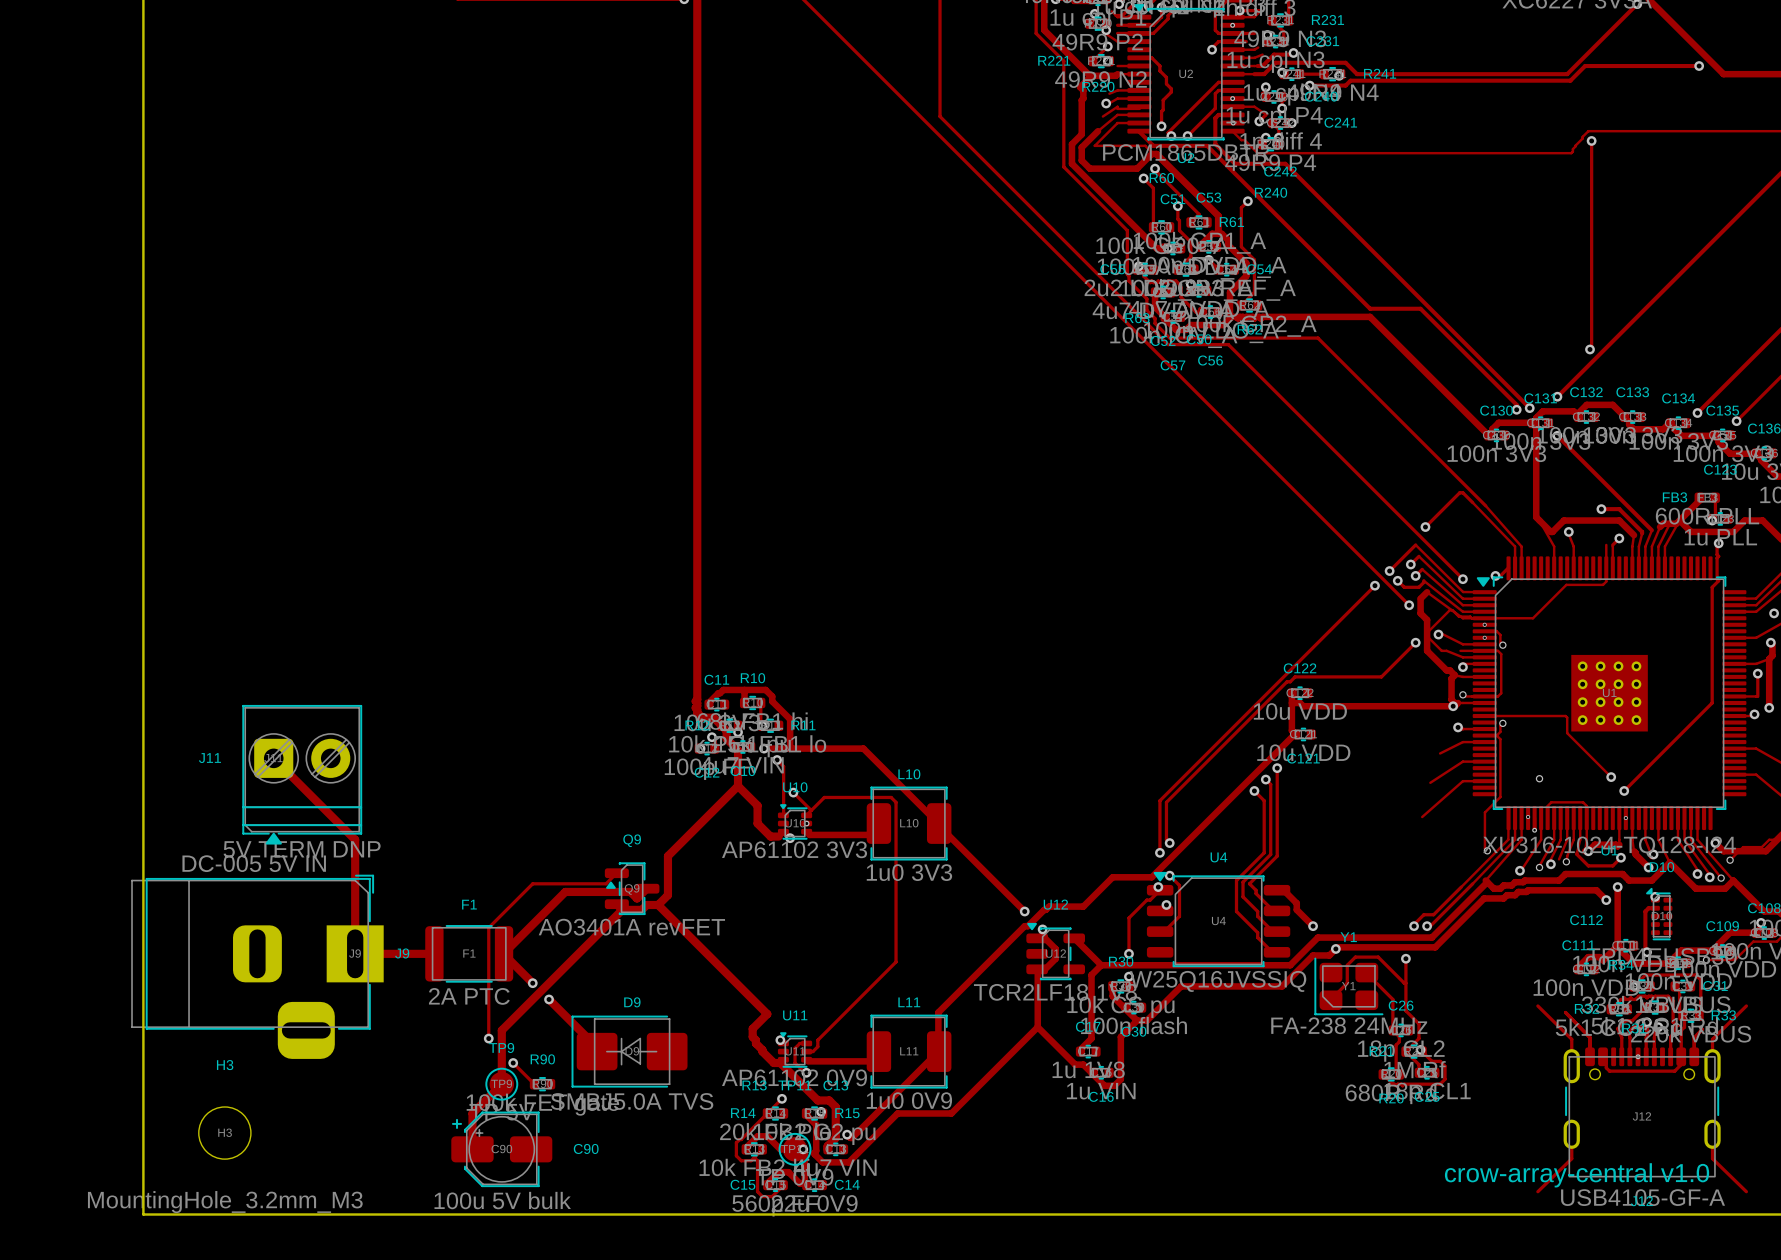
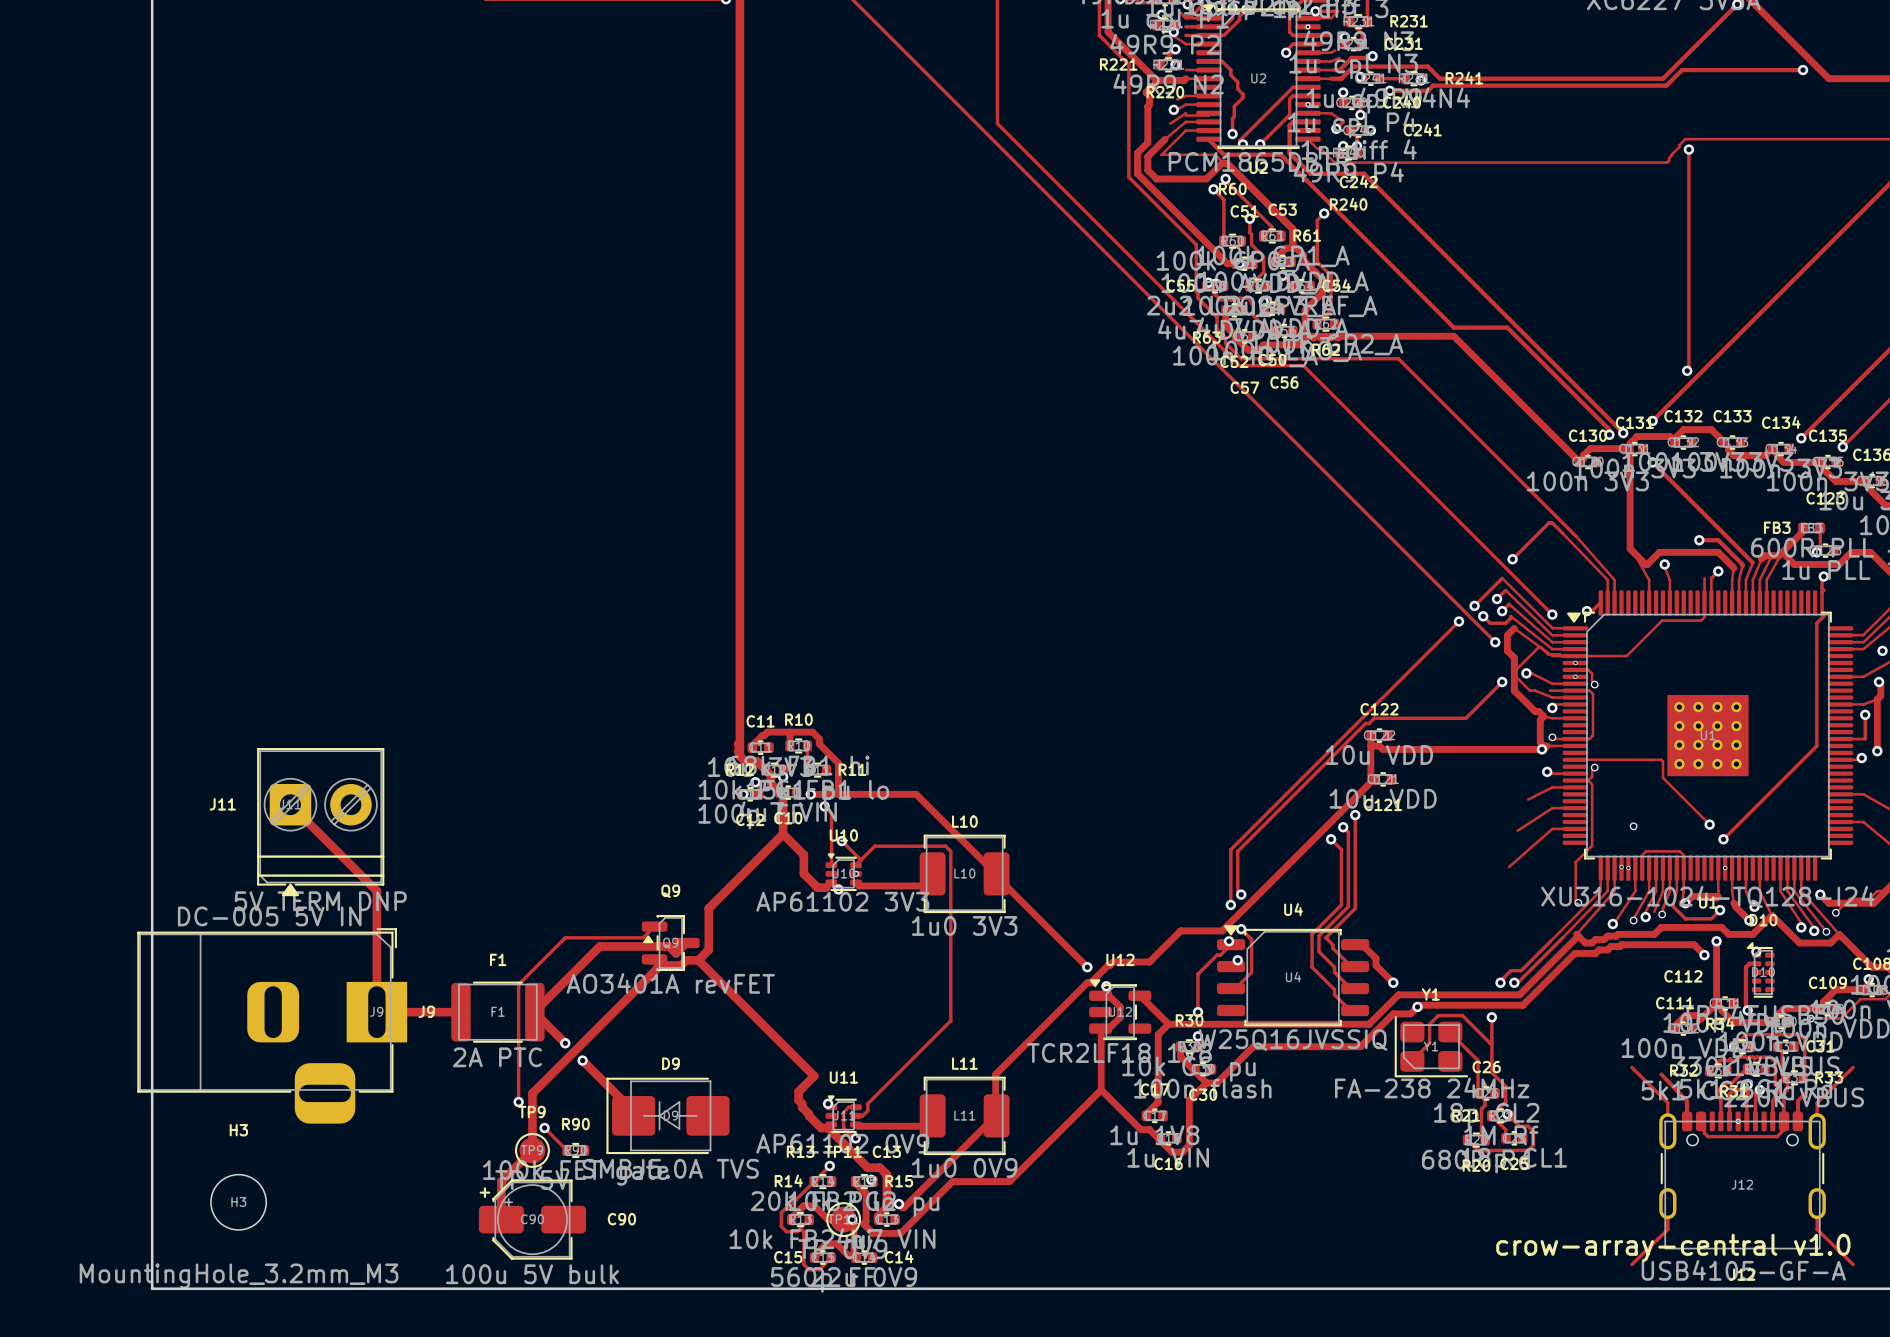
via: none -> (1628, 868)
via: (1534, 830) -> none
J9 footprint: [131, 874, 384, 1059] -> [137, 928, 408, 1124]

